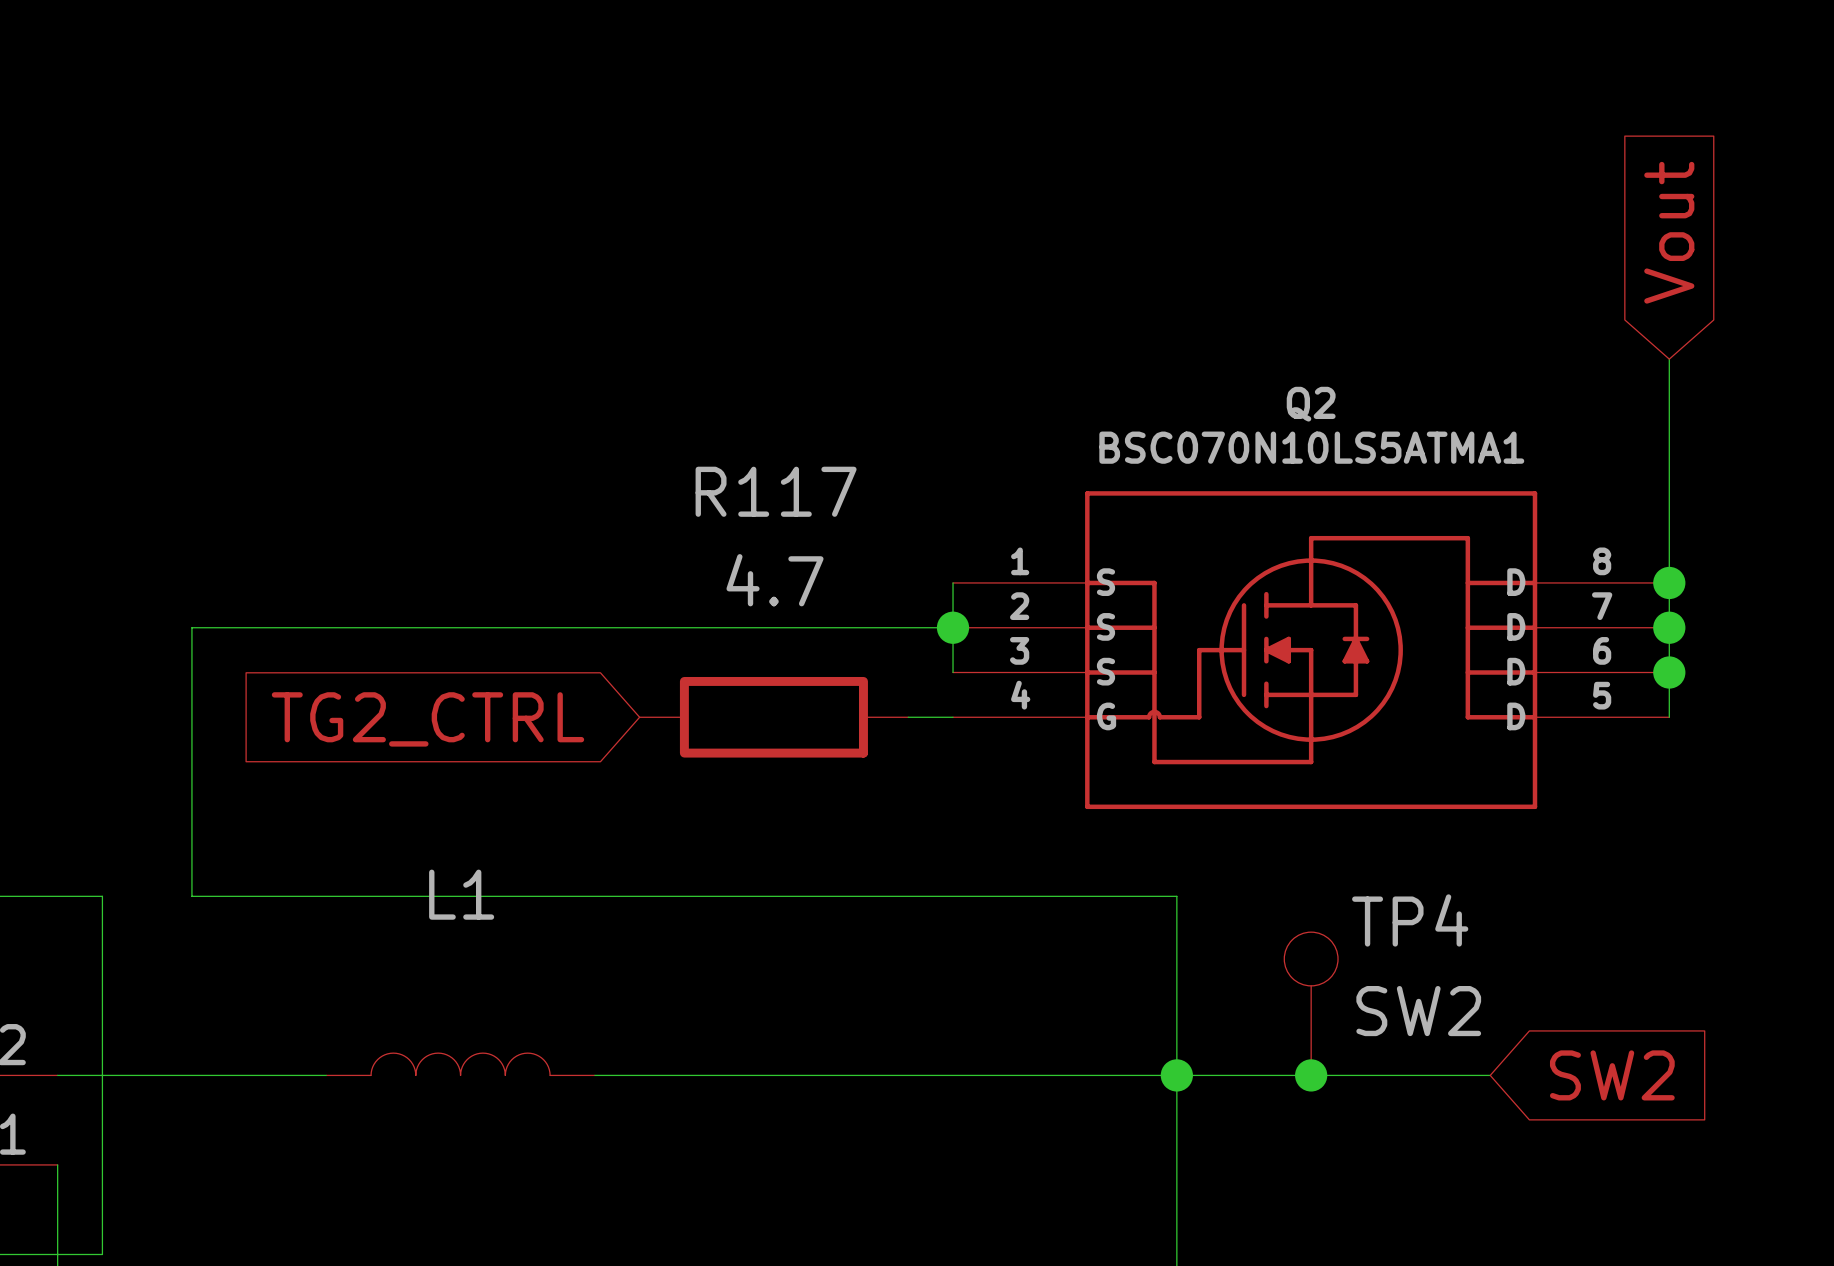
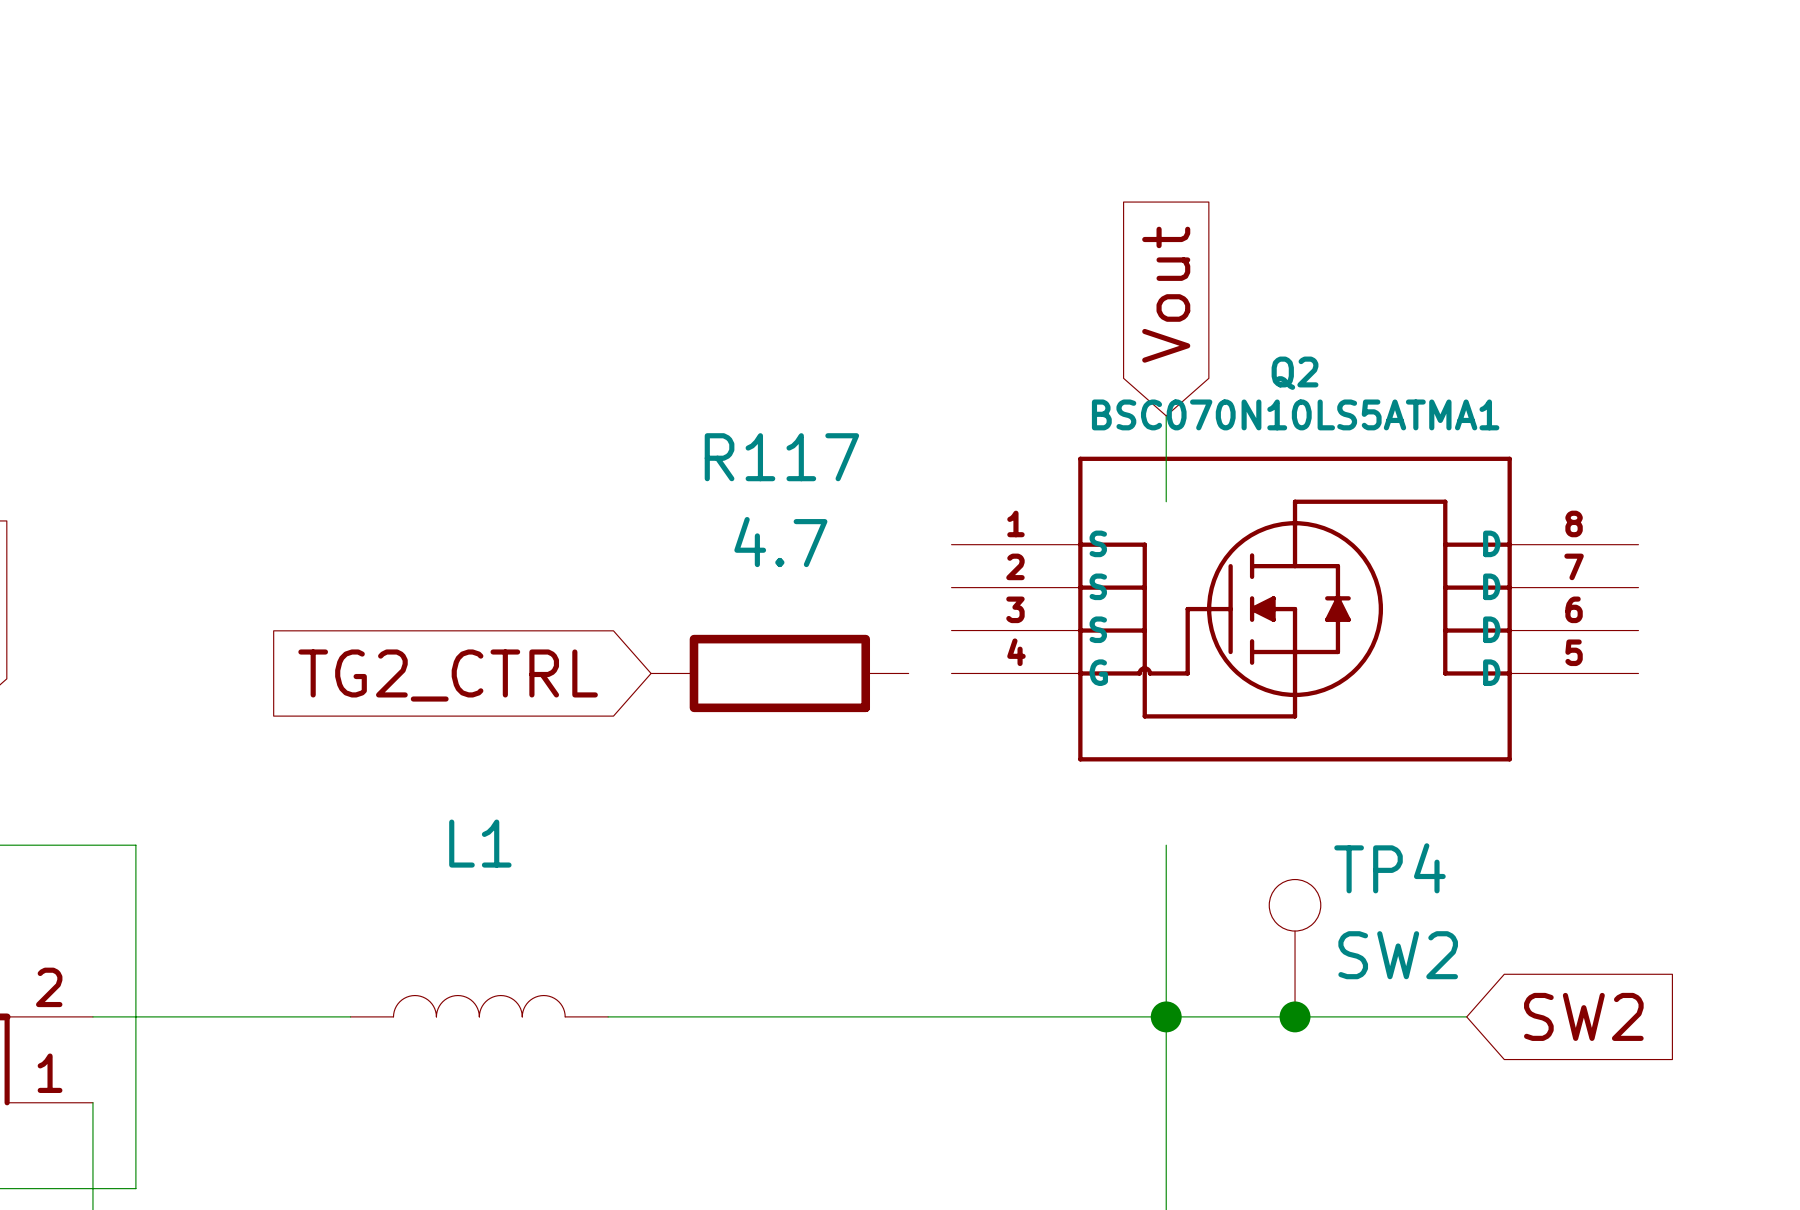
global label position: Vout (1669, 232) -> Vout (1166, 294)
wire: (1669, 359) (1669, 717) -> none
wire: (953, 582) (953, 672) -> (1166, 415) (1166, 501)
junction: (1669, 582) -> none
wire: (953, 627) (191, 627) (191, 896) (1176, 896) -> none
junction: (953, 627) -> none
junction: (1669, 627) -> none
junction: (1669, 672) -> none
wire: (908, 717) (953, 717) -> none

